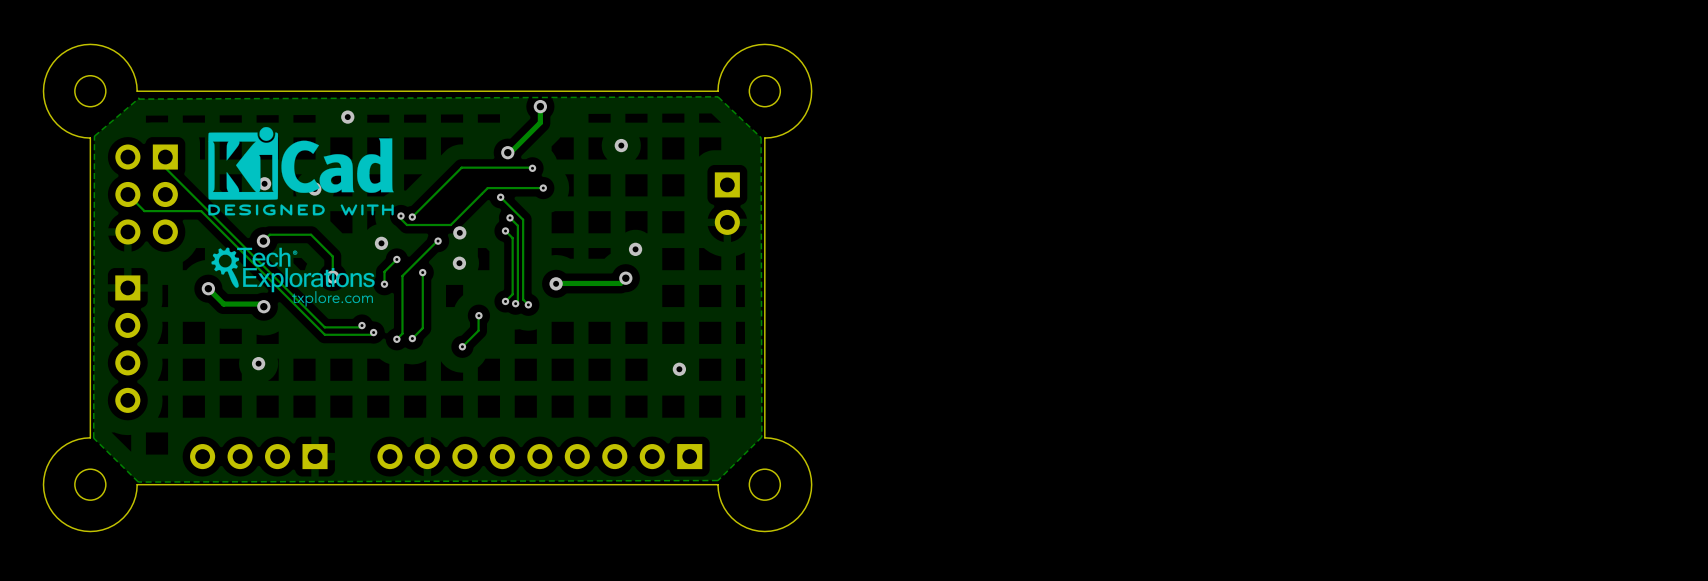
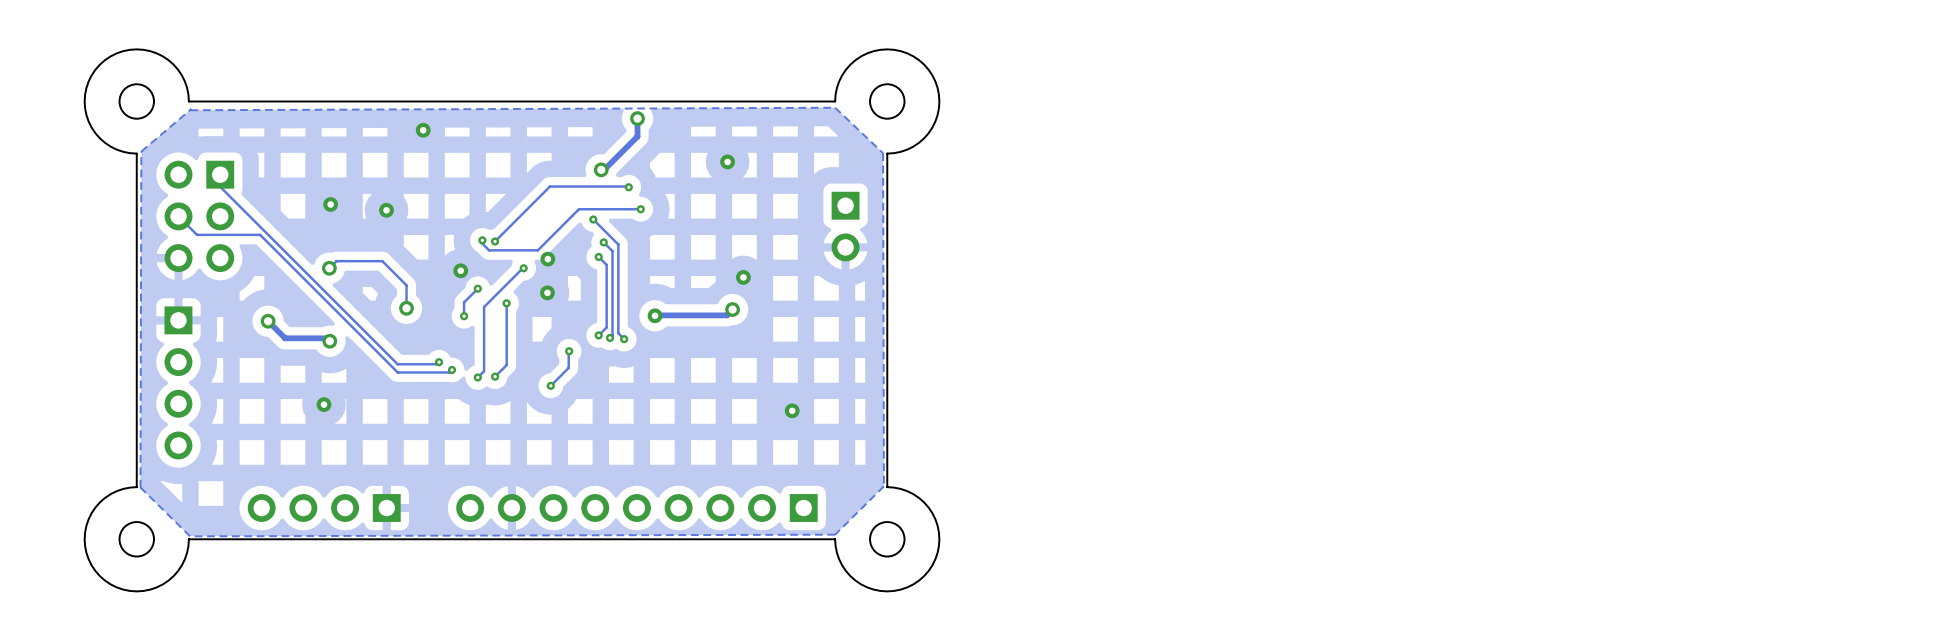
drawing: [208, 127, 394, 216] -> none
drawing: [211, 247, 375, 307] -> none

